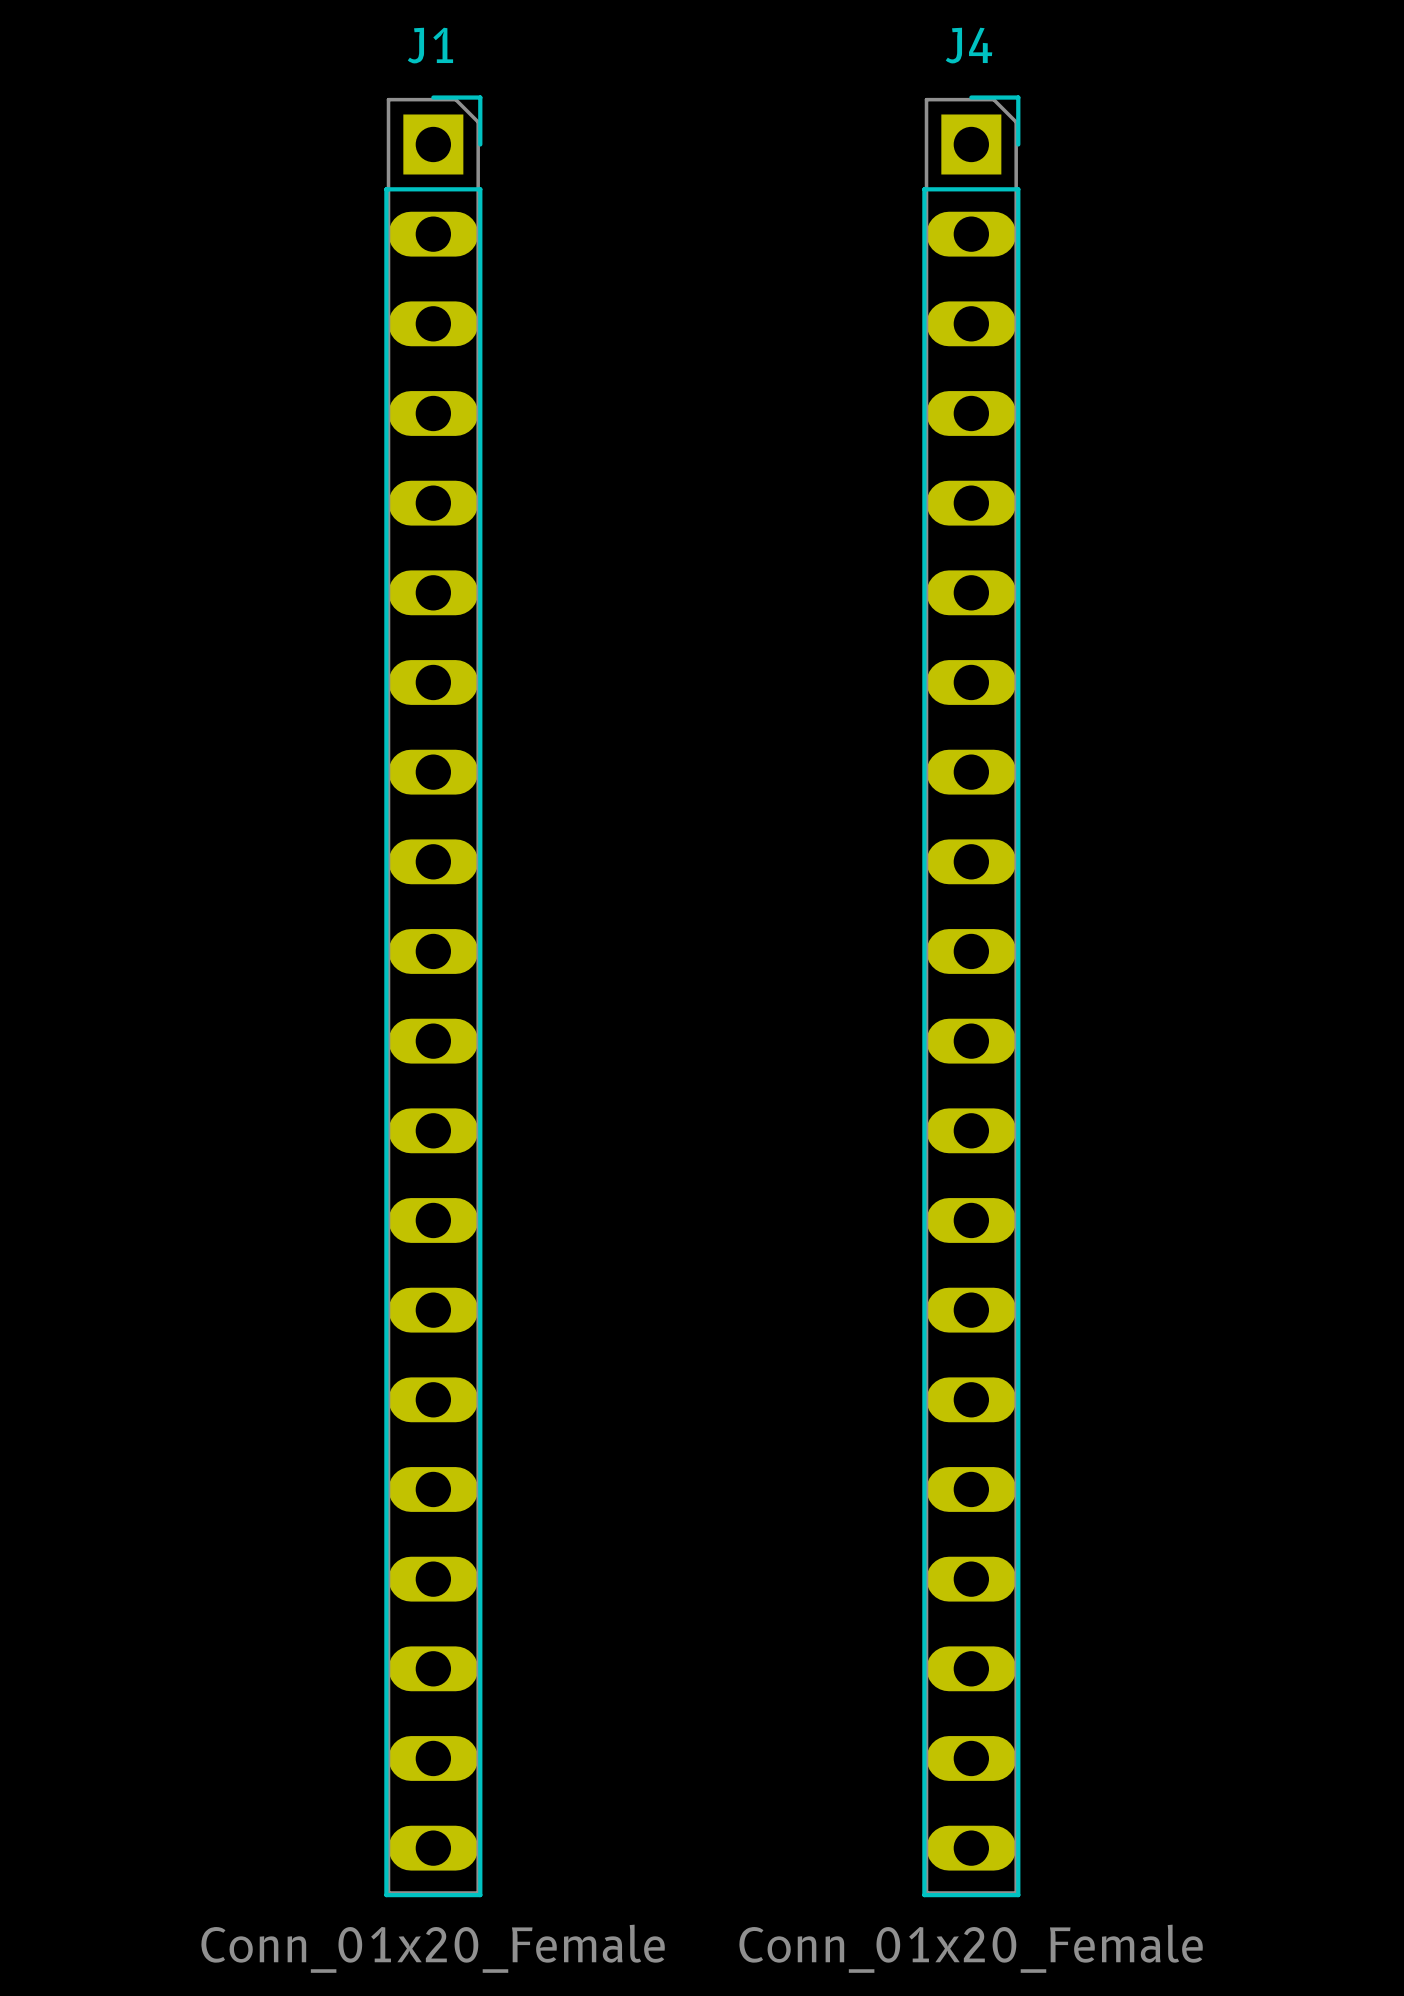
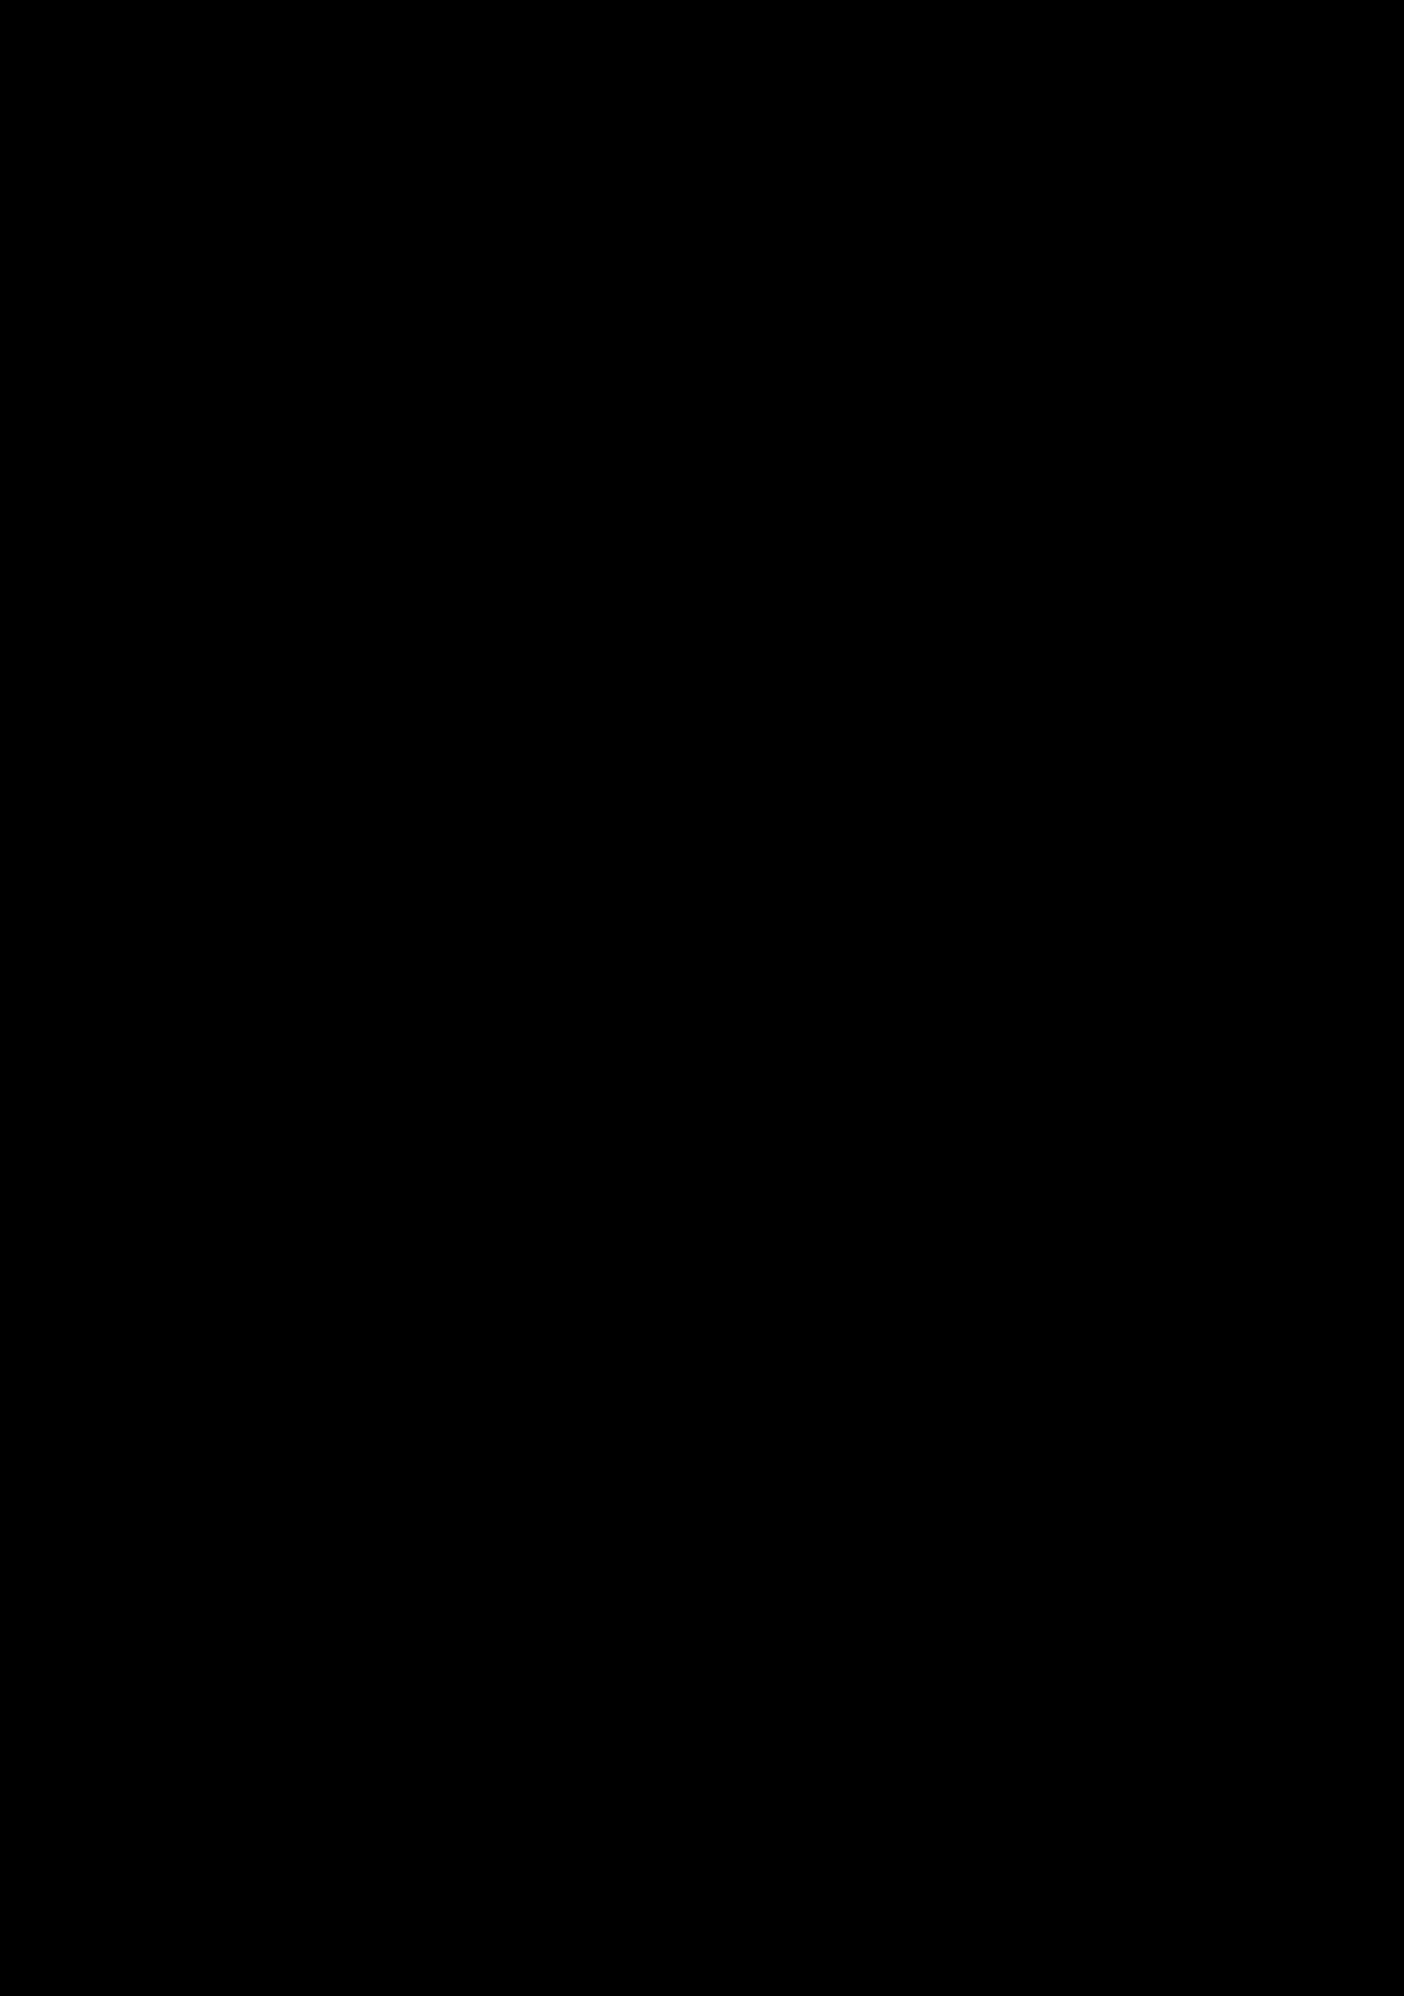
J1: Conn_01x20_Female (433, 996) -> none
J4: Conn_01x20_Female (971, 996) -> none

